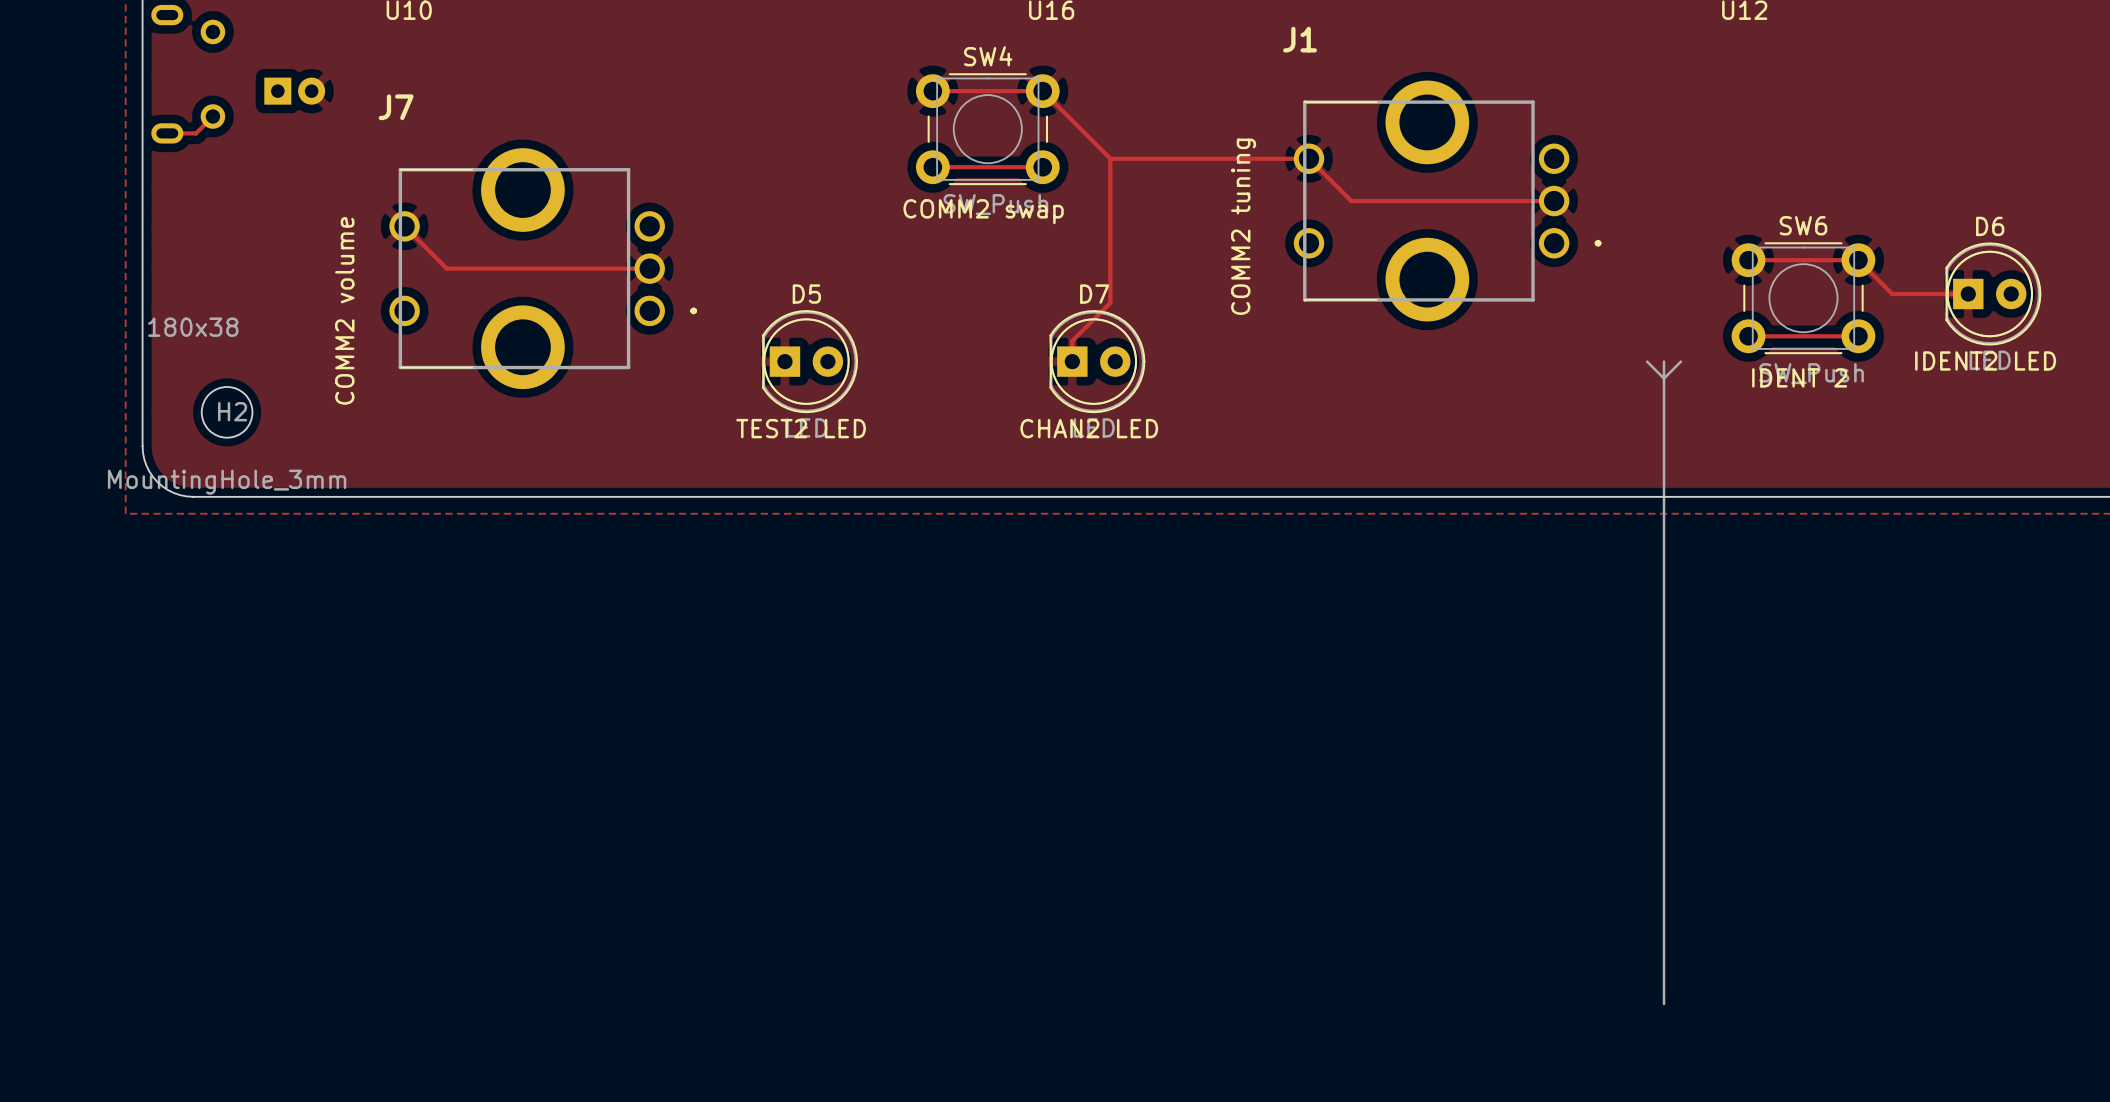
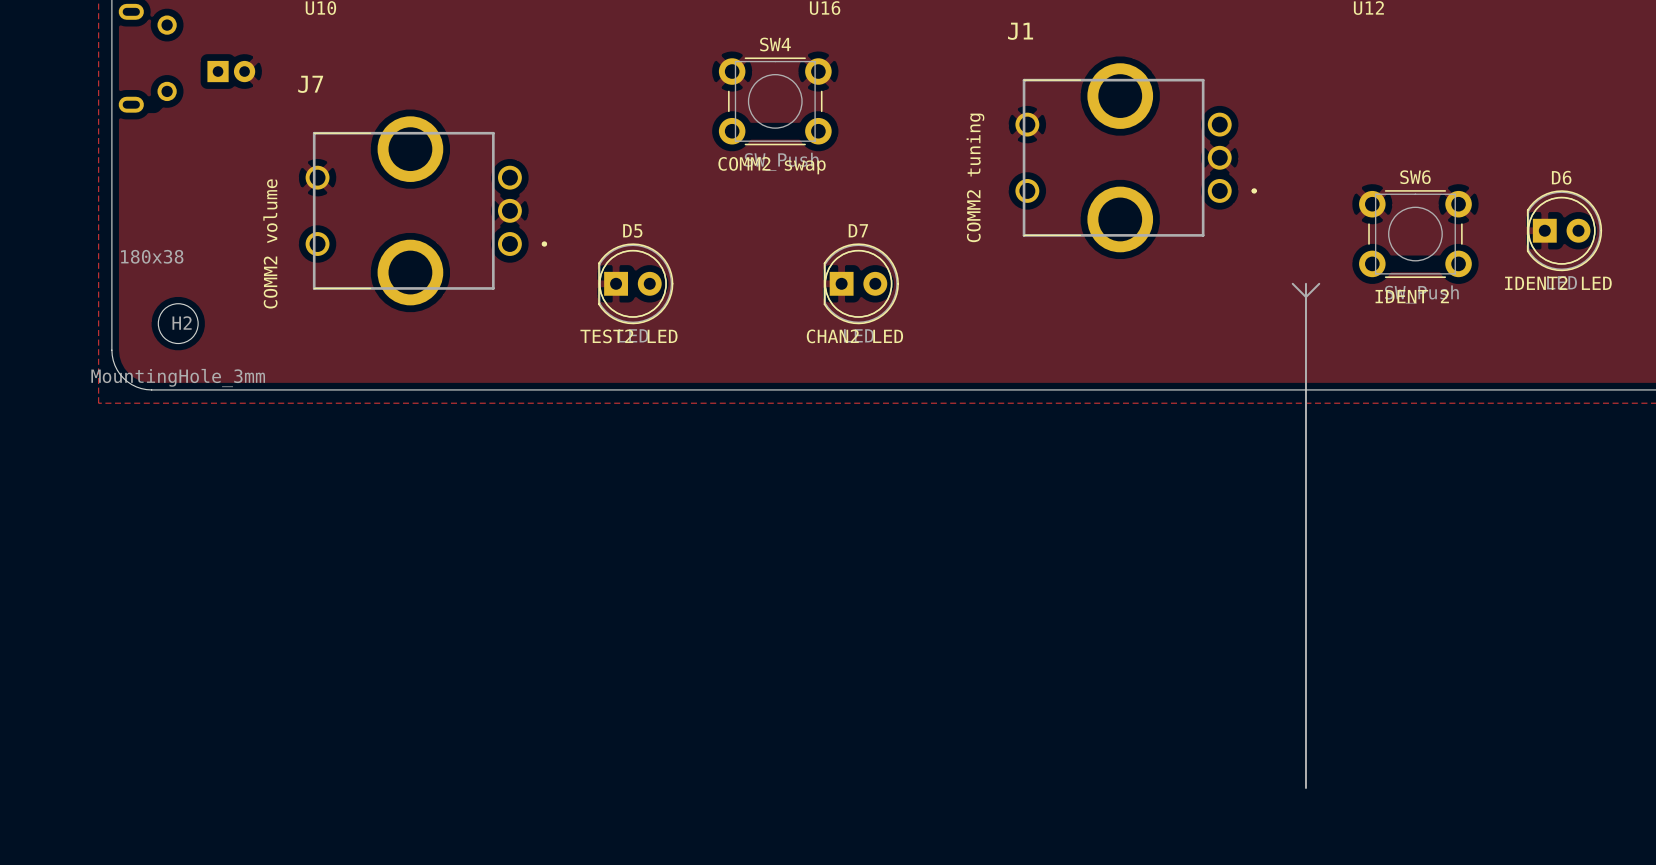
track: (932, 91) (1042, 91) (1110, 158) -> none
track: (212, 116) (196, 133) (167, 133) -> none
track: (1110, 158) (1309, 158) (1351, 201) (1554, 201) -> none
track: (1110, 158) (1110, 302) (1072, 340) (1072, 361) -> none
track: (932, 167) (1042, 167) -> none
track: (404, 226) (446, 268) (649, 268) -> none
track: (1748, 260) (1858, 260) (1892, 294) (1968, 294) -> none
track: (1748, 336) (1858, 336) -> none

